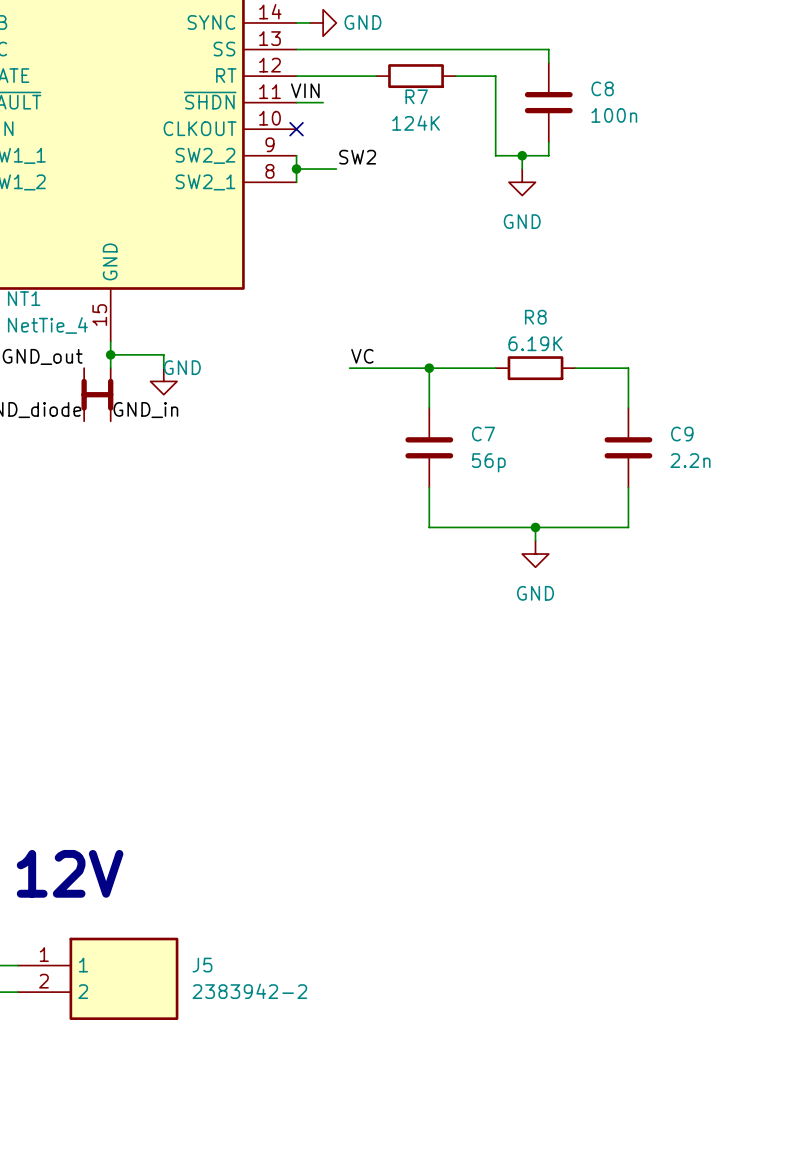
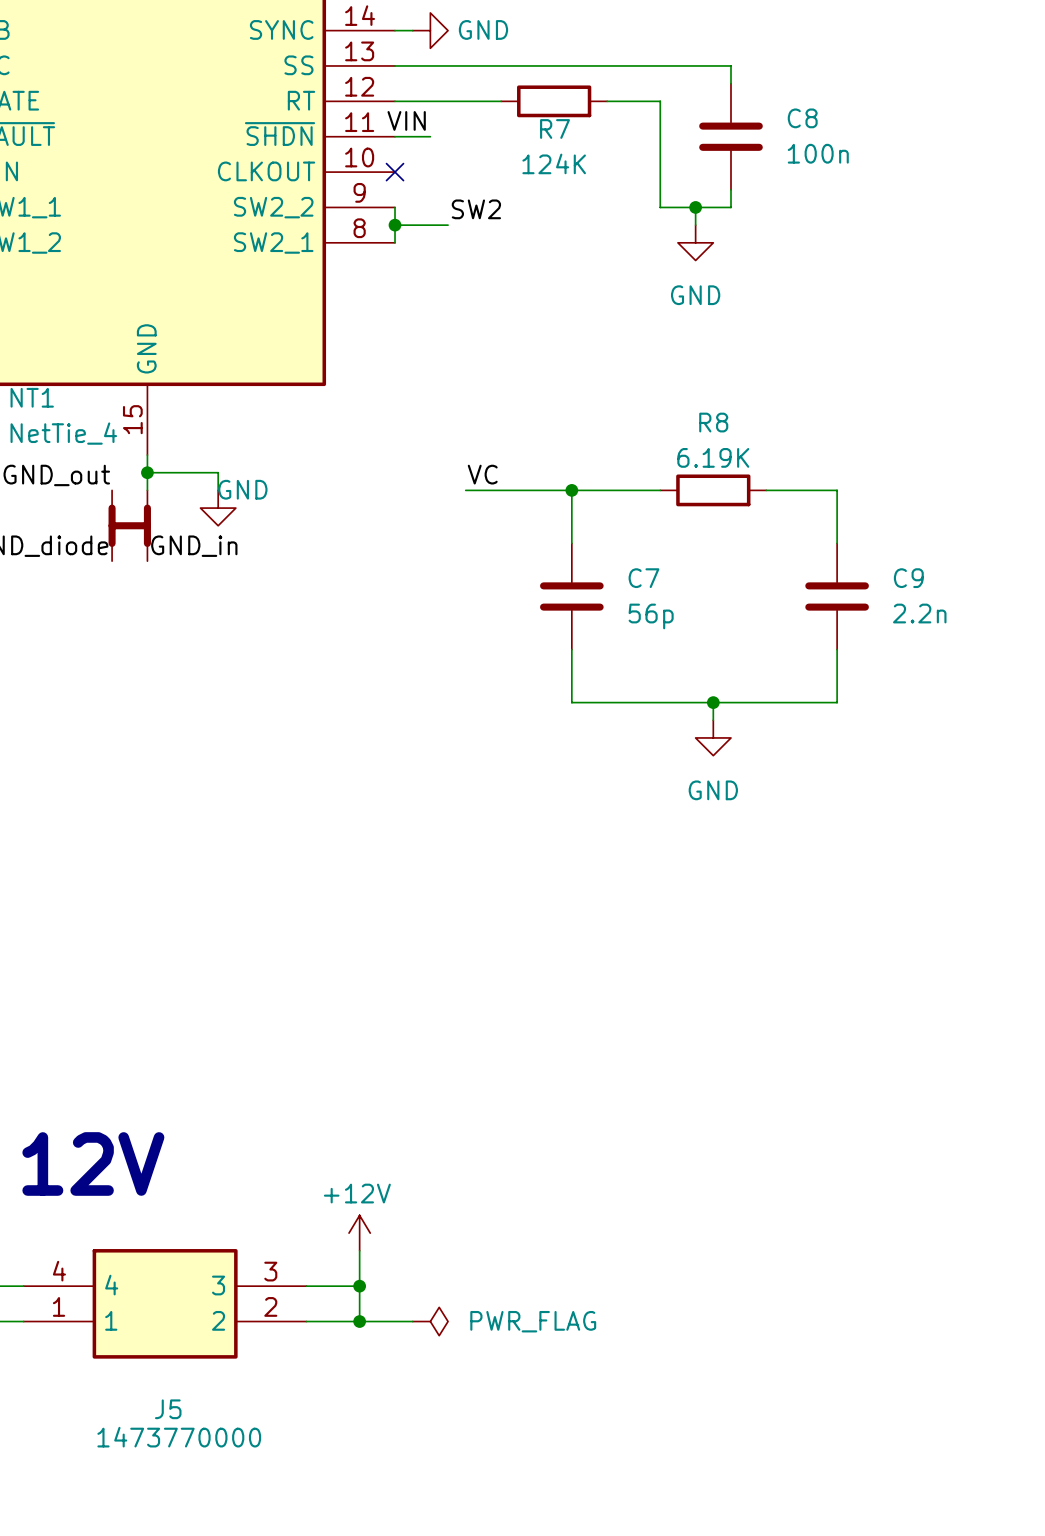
power symbol: none -> +12V (359, 1233)
J5 symbol: [17, 937, 179, 1020] -> [23, 1249, 307, 1359]
wire: none -> (359, 1250) (359, 1321)
J5 name position: J5 (202, 965) -> J5 (168, 1409)
wire: none -> (306, 1286) (359, 1286)
junction: none -> (359, 1286)
J5 value: 2383942-2 (249, 991) -> 1473770000 (179, 1437)
wire: none -> (306, 1321) (412, 1321)
junction: none -> (359, 1321)
power symbol: none -> PWR_FLAG (430, 1321)

